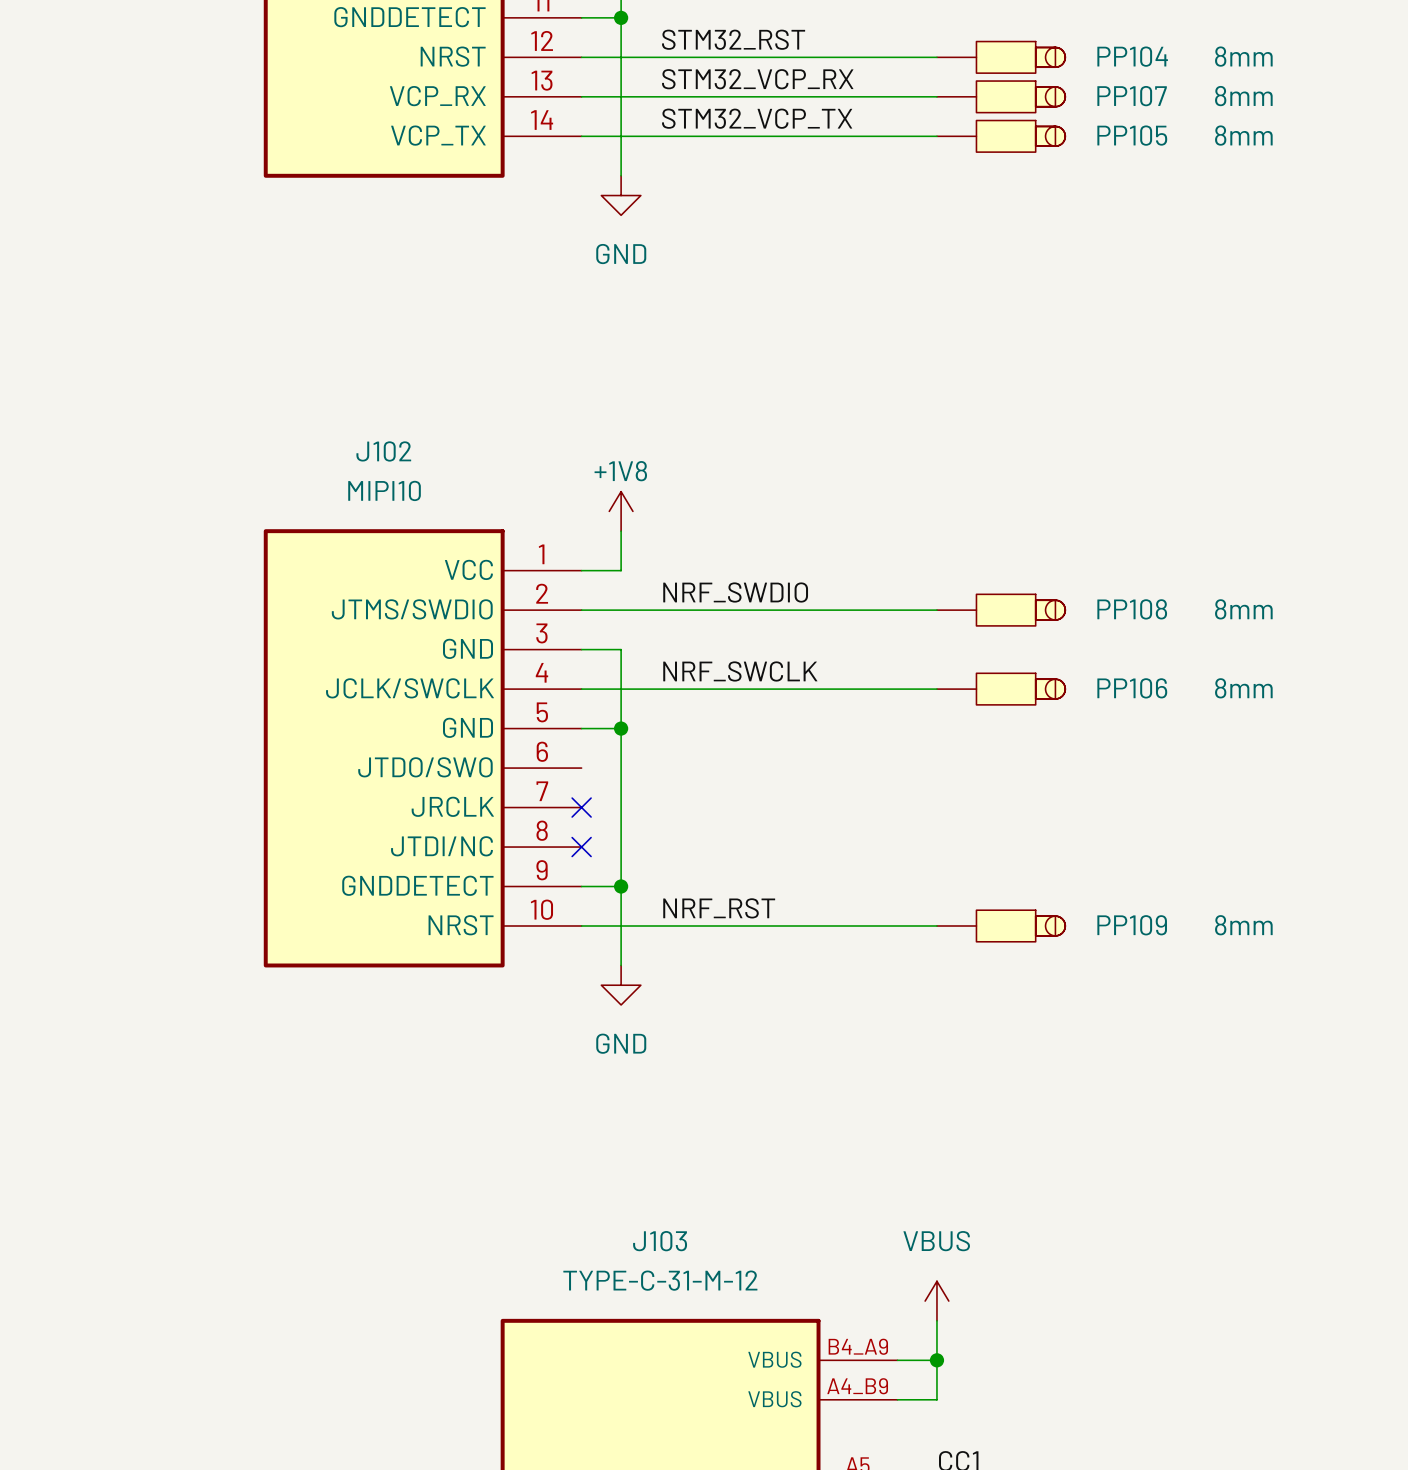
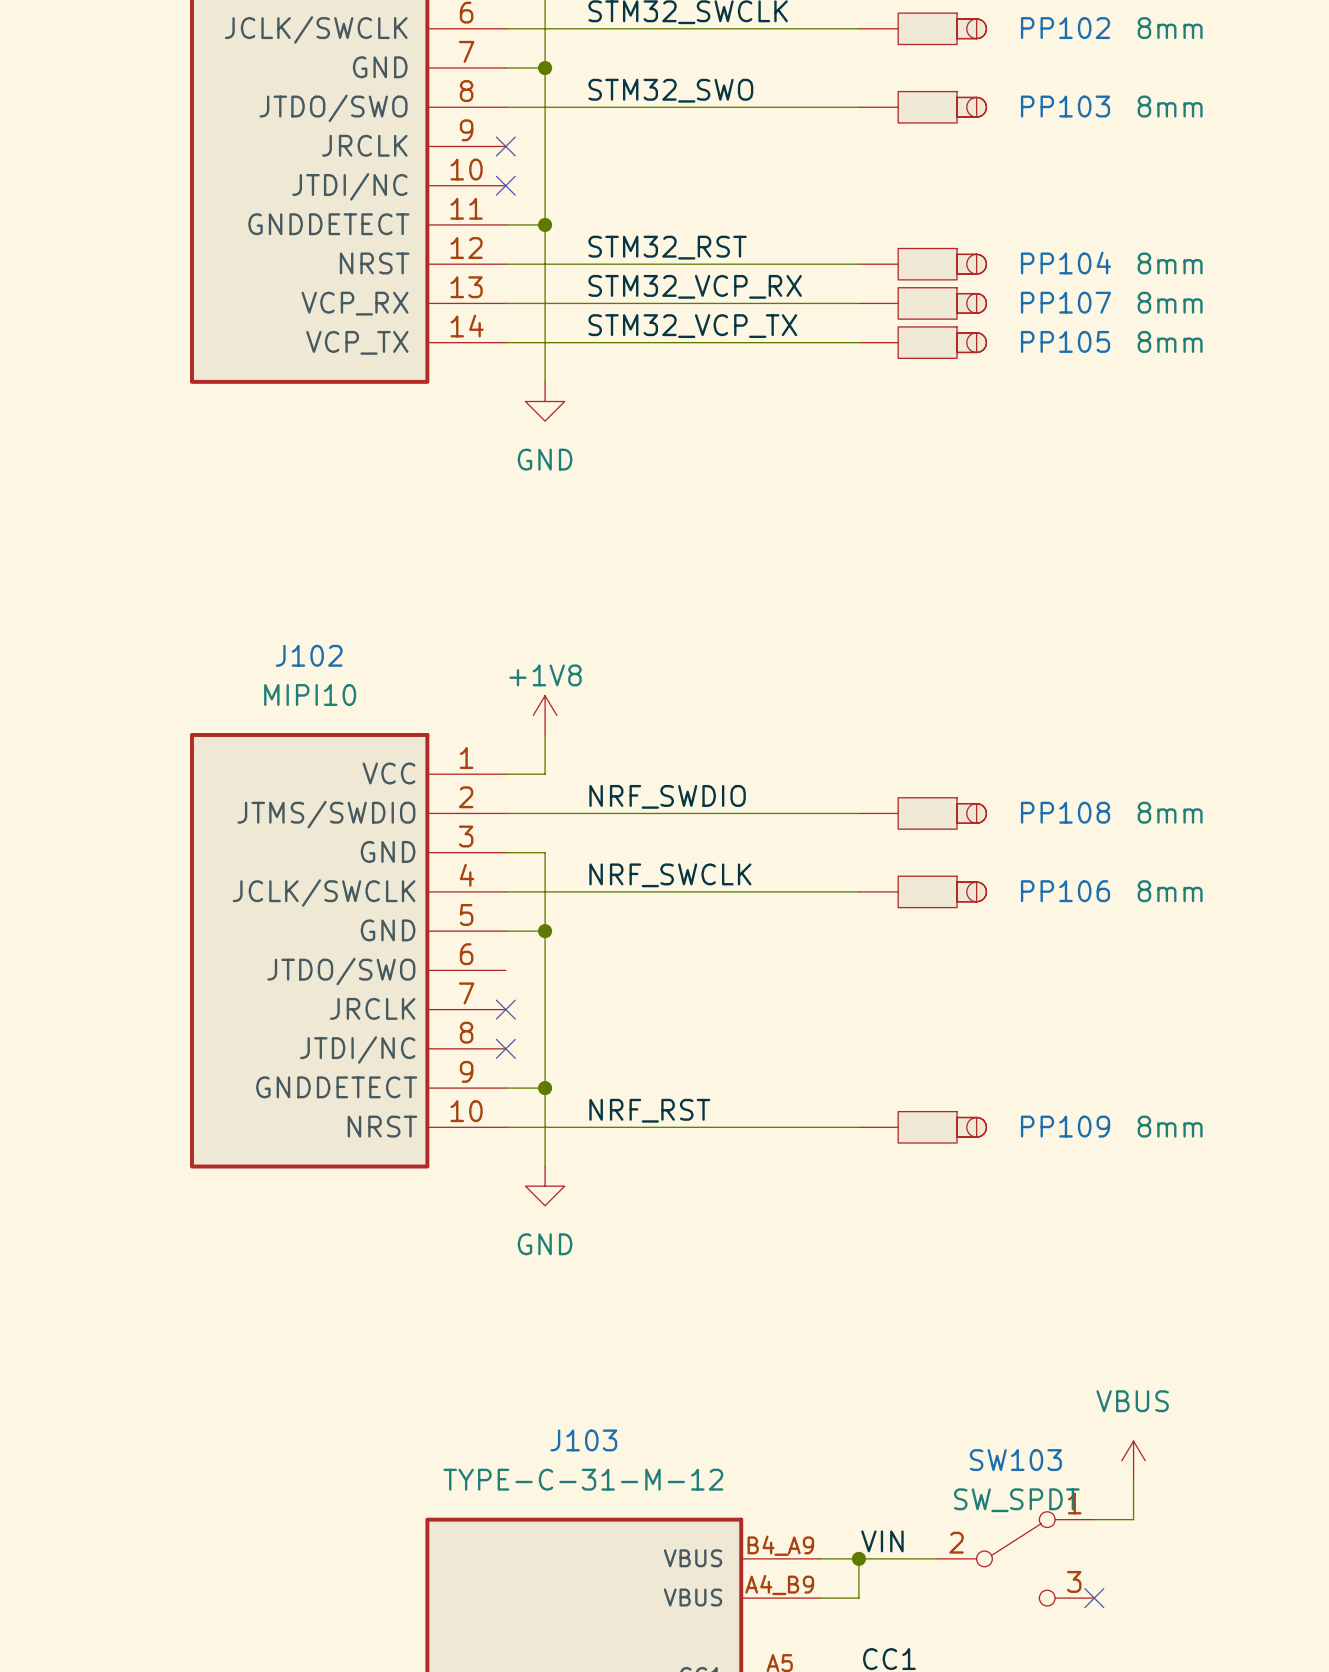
wire: none -> (1133, 1480) (1133, 1519) (1094, 1519)
power symbol position: VBUS (936, 1301) -> VBUS (1133, 1460)
wire: (936, 1320) (936, 1360) -> (937, 1558) (858, 1558)
label: none -> VIN (882, 1541)
SW103: none -> SW_SPDT (1015, 1558)
no-connect mark: none -> (1094, 1598)

